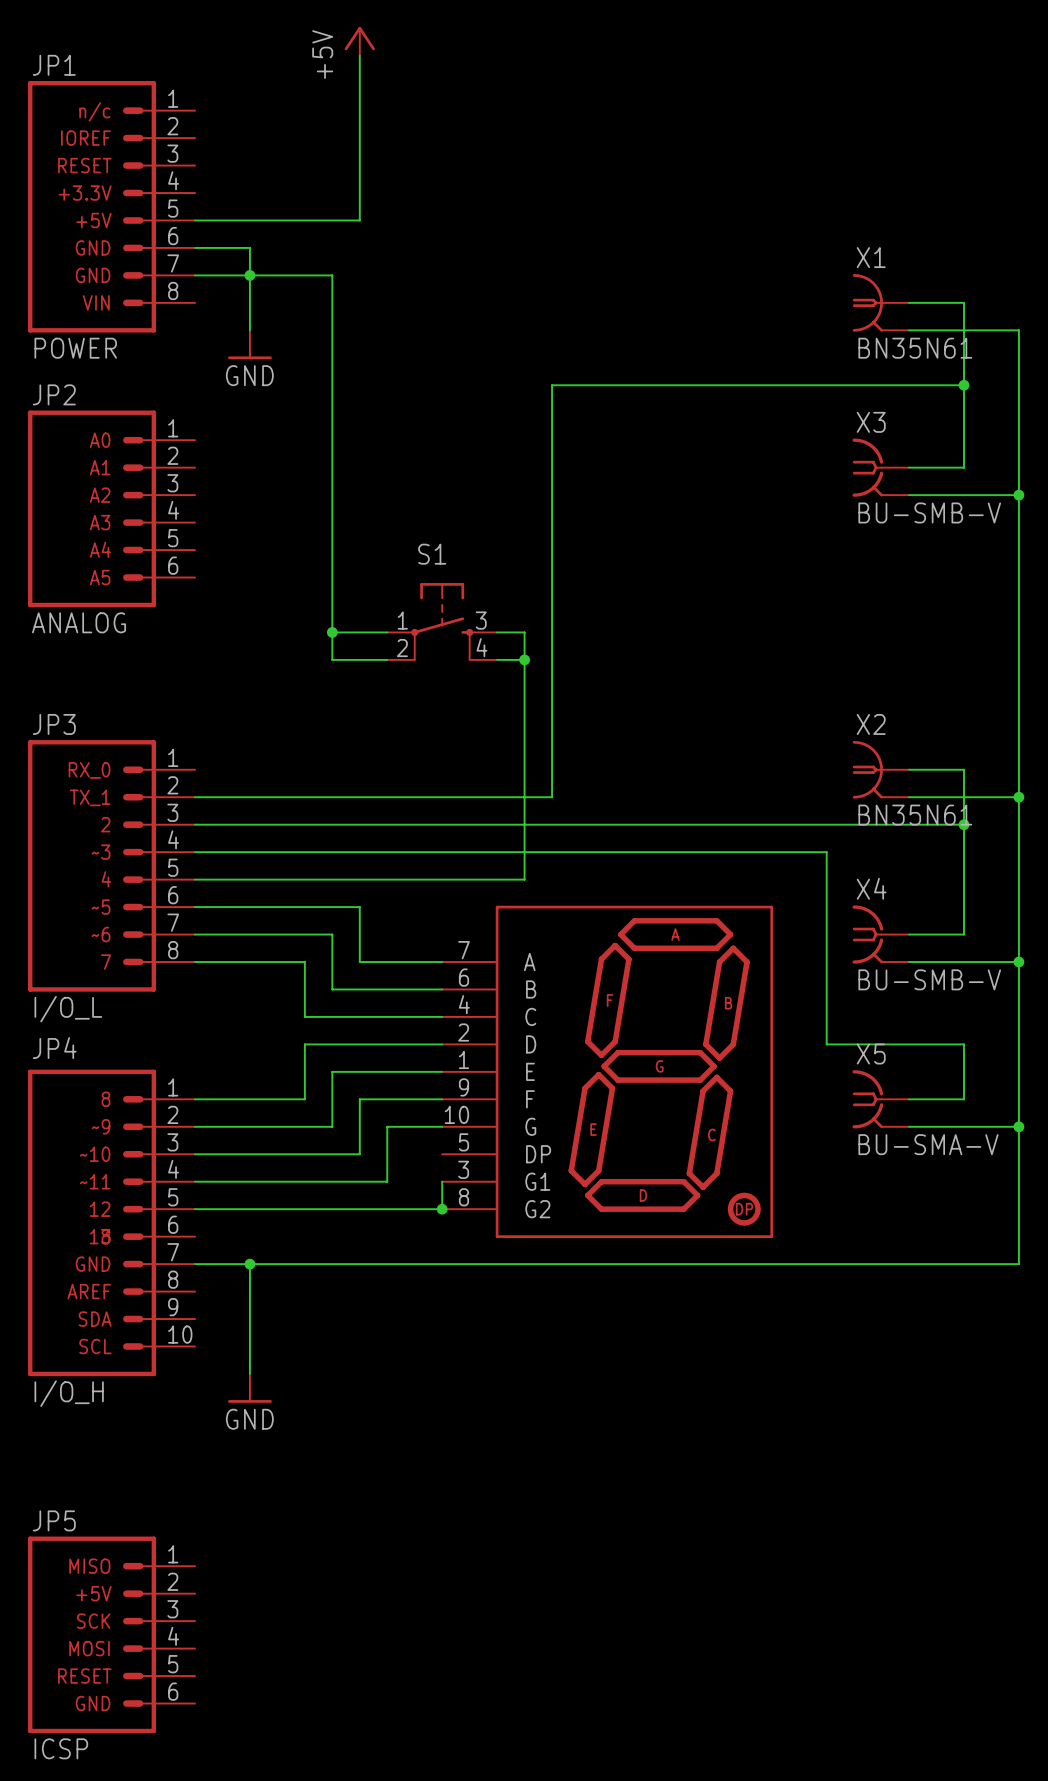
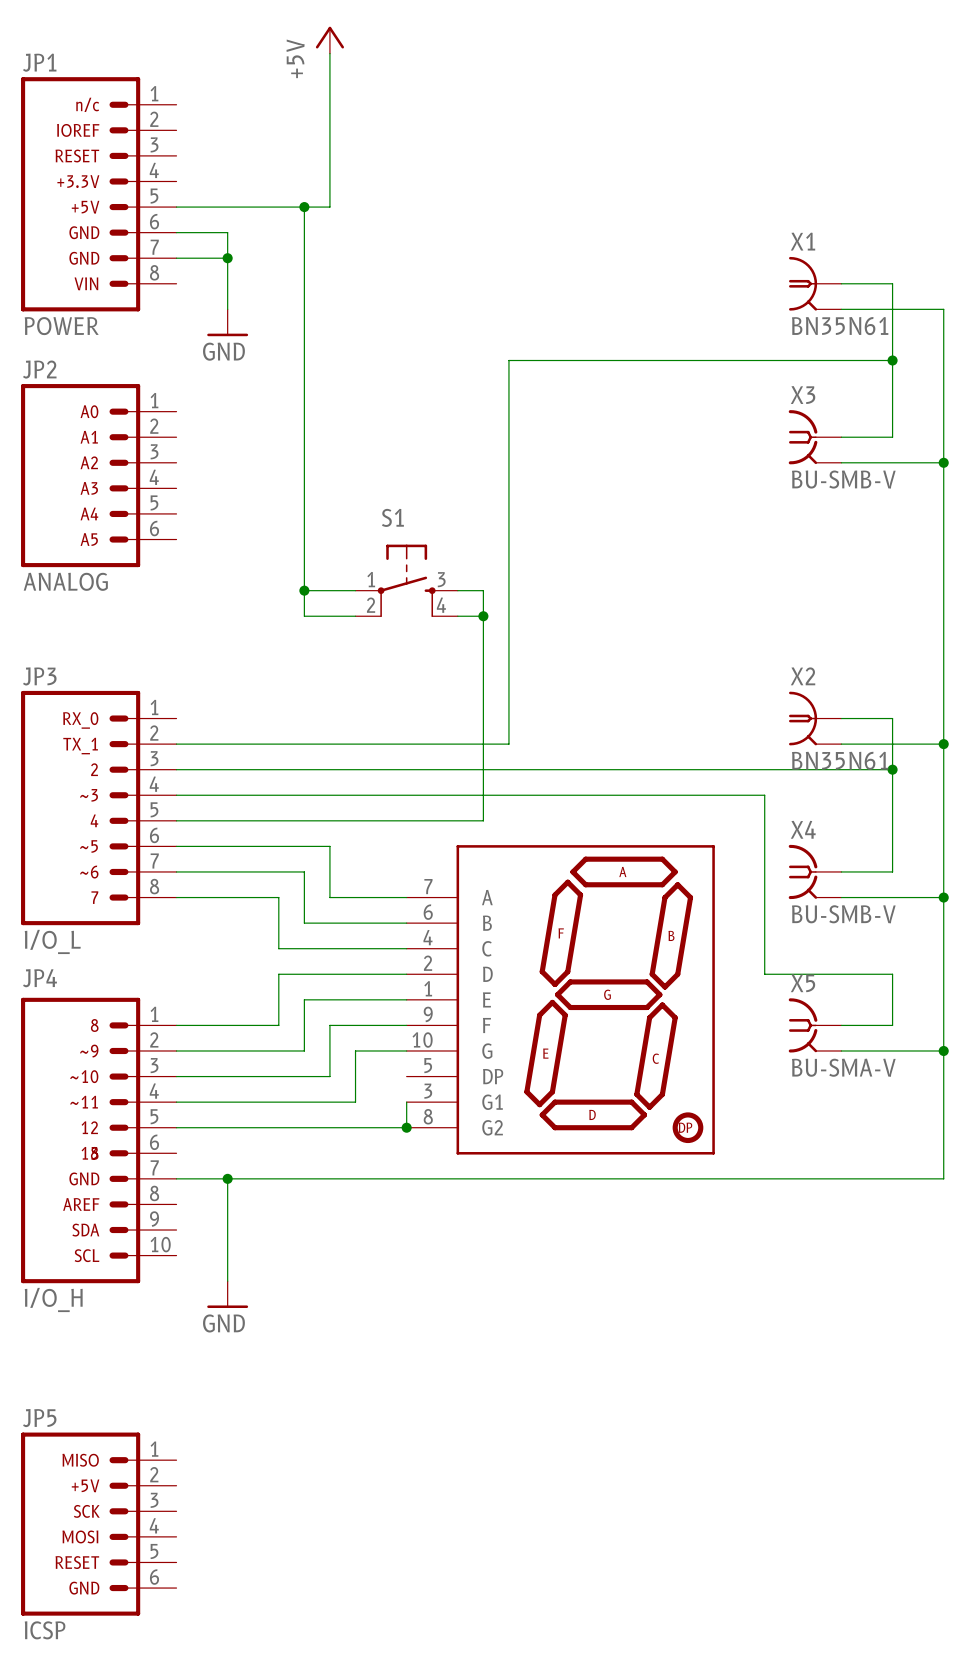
junction: none -> (304, 207)
wire: (249, 275) (332, 275) -> (304, 207) (304, 258)

